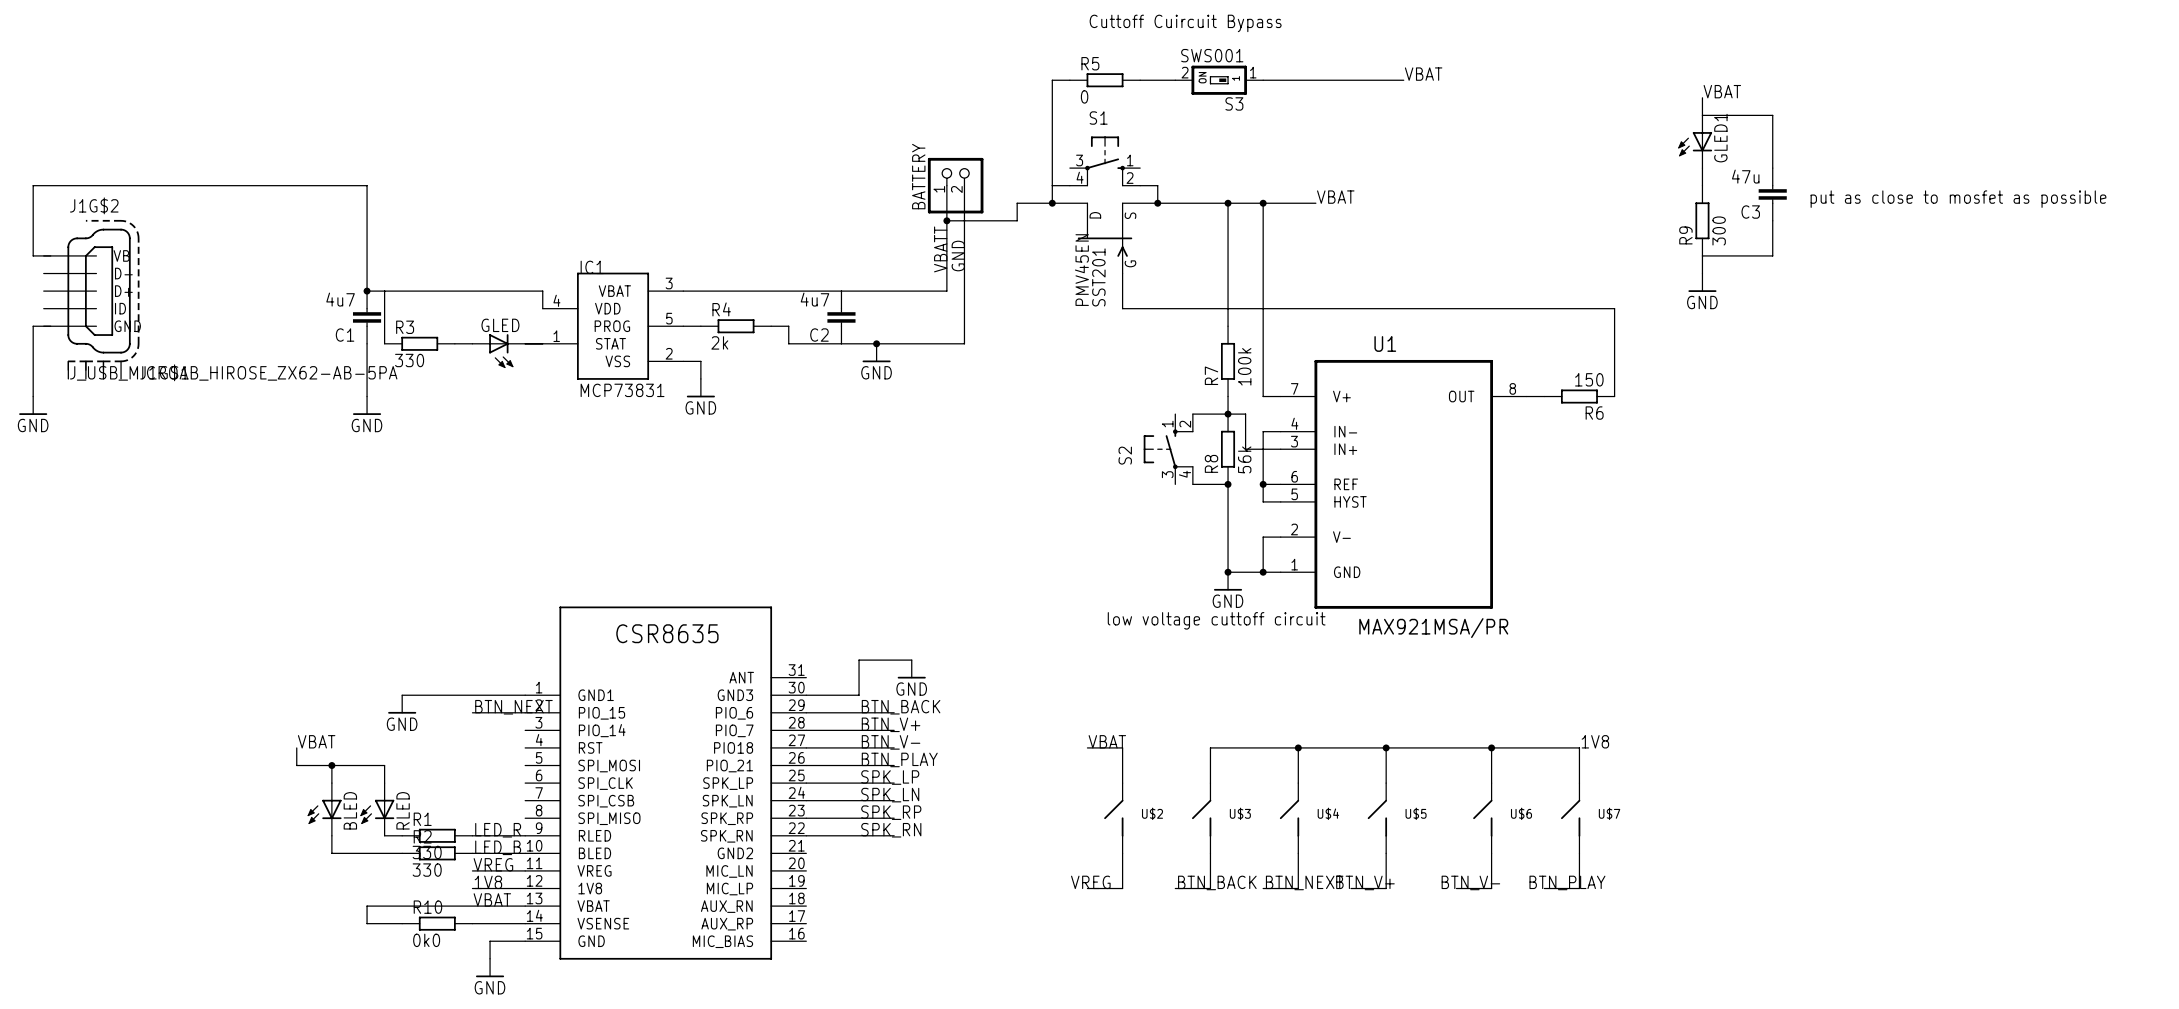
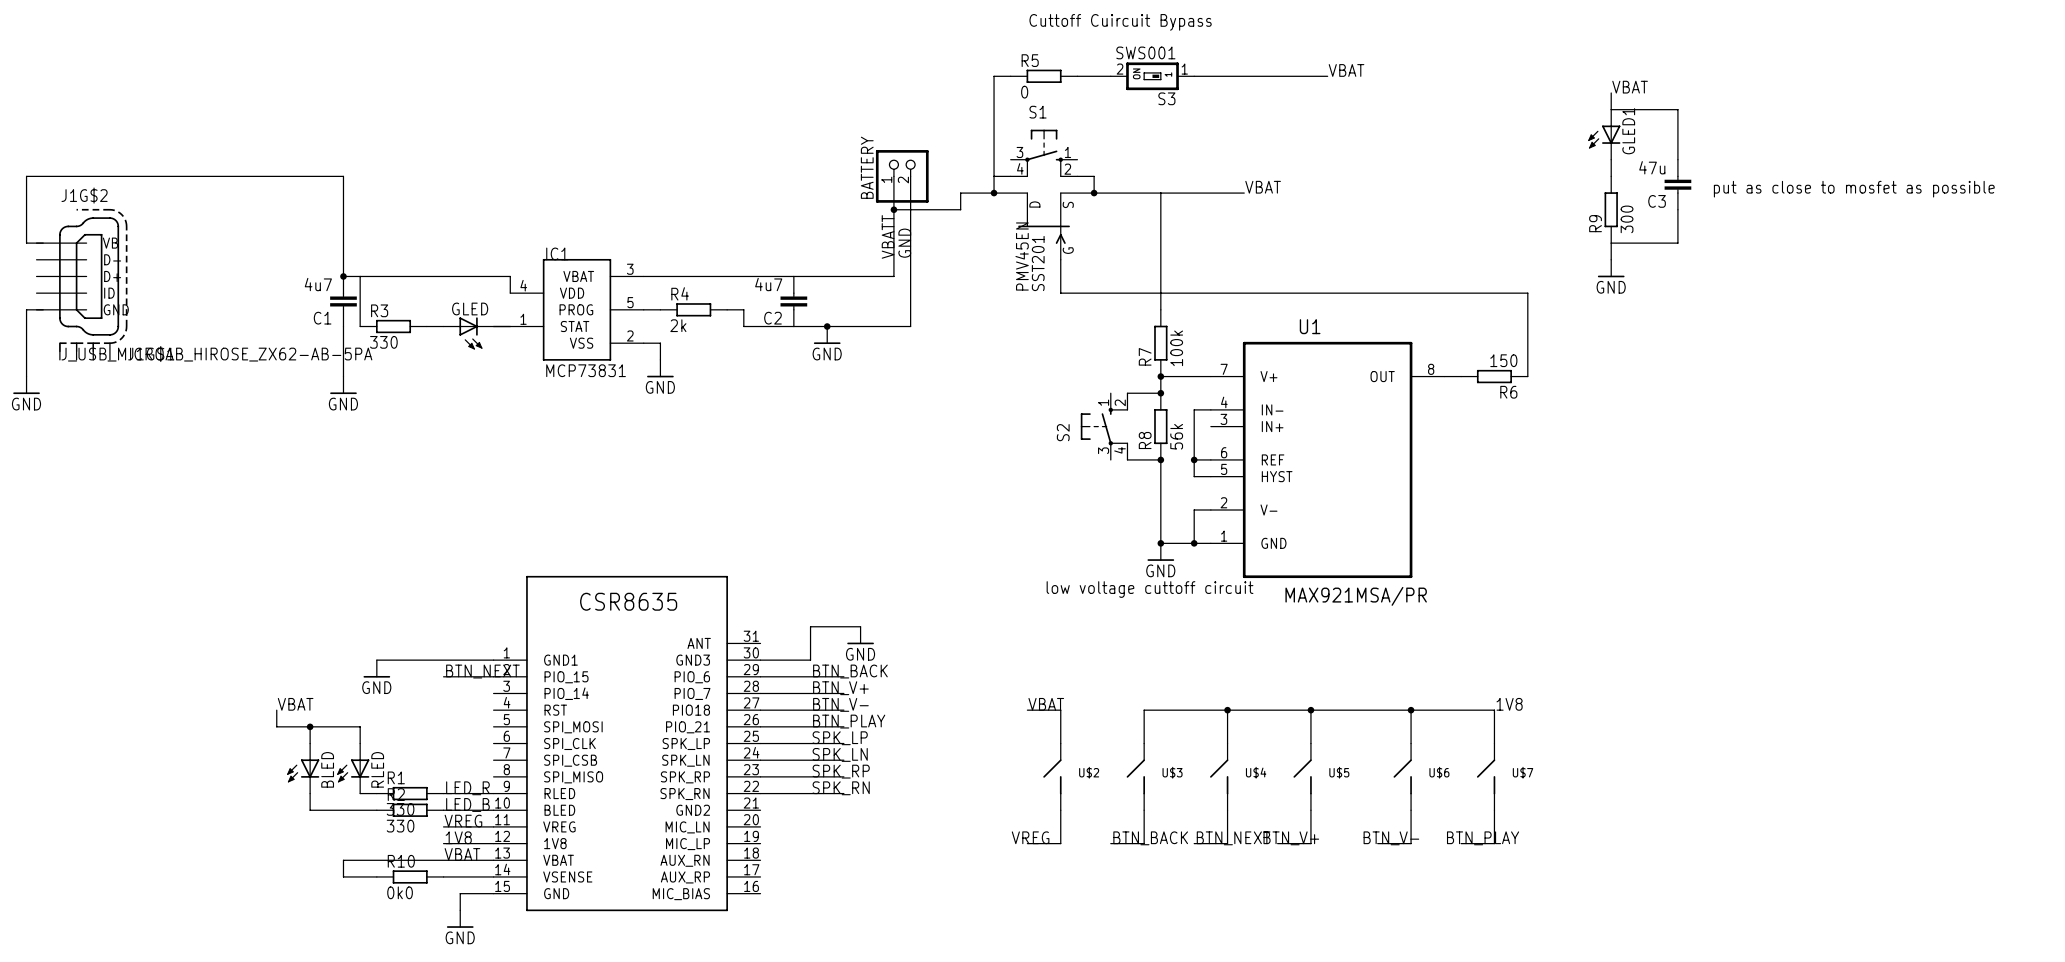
junction: (1228, 203) -> none
wire: (1263, 203) (1263, 396) -> (1160, 376) (1194, 376)
junction: (1263, 203) -> none
junction: none -> (1160, 376)
wire: (1228, 414) (1245, 414) (1245, 449) (1280, 449) -> none

